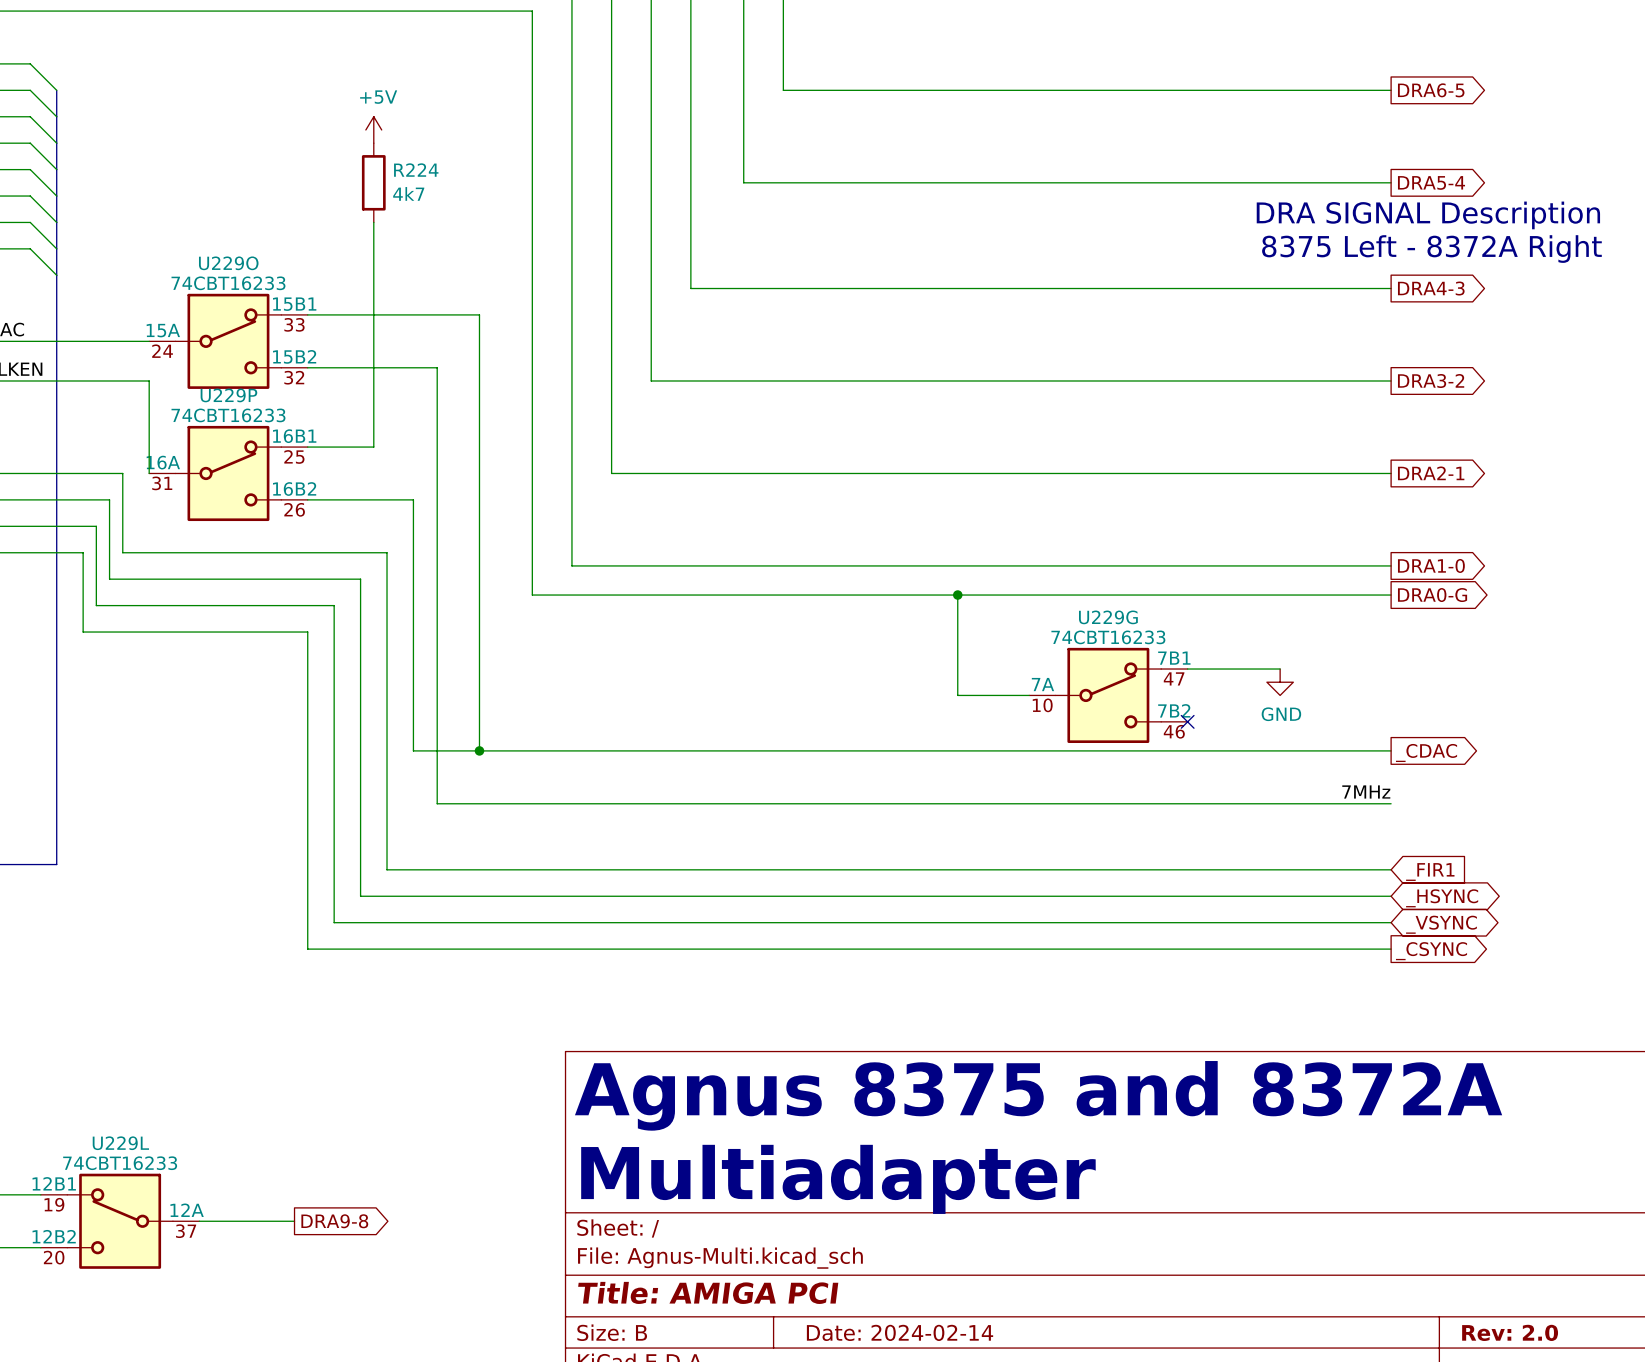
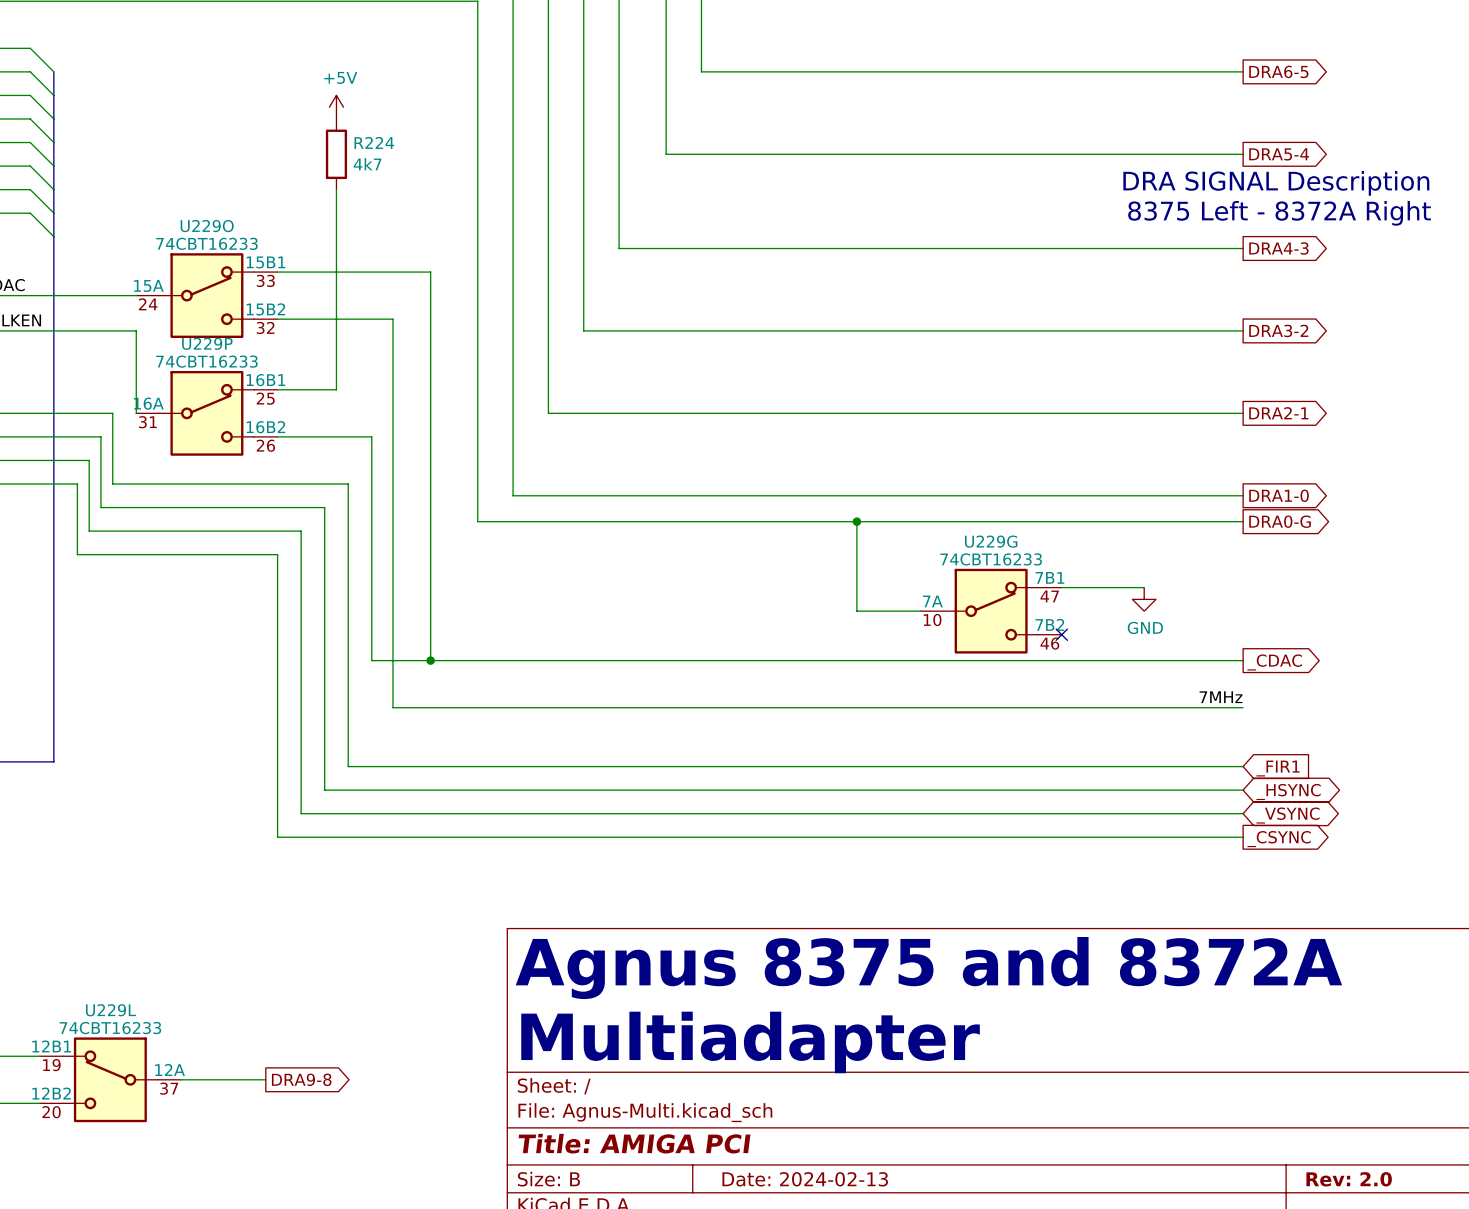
title block: Date: 2024-02-14 (900, 1332) -> Date: 2024-02-13 (805, 1179)

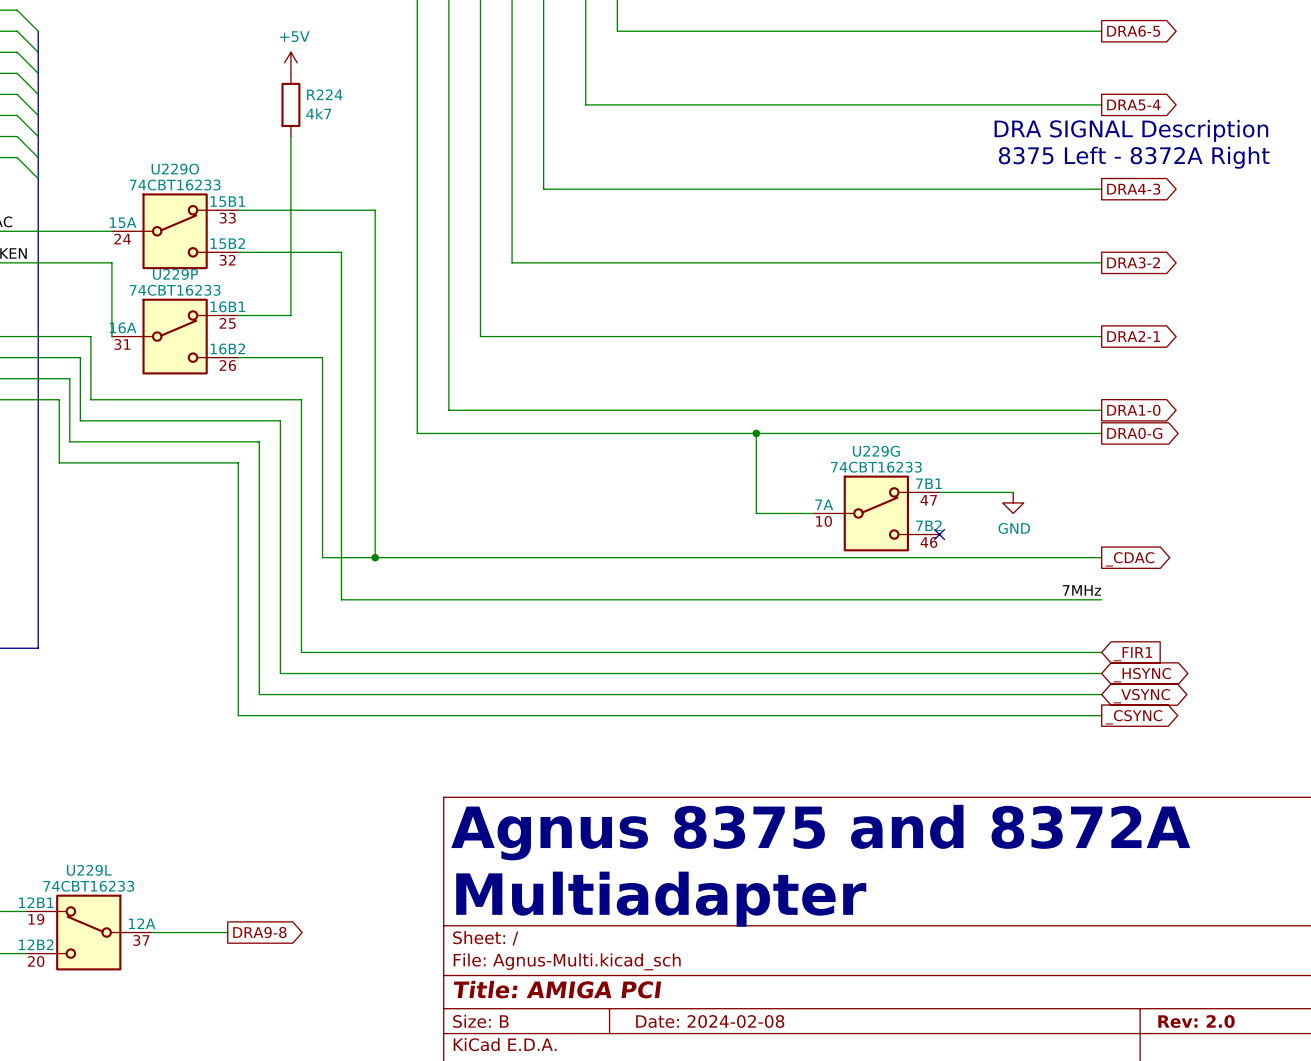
title block: Date: 2024-02-13 (805, 1179) -> Date: 2024-02-08 (710, 1021)

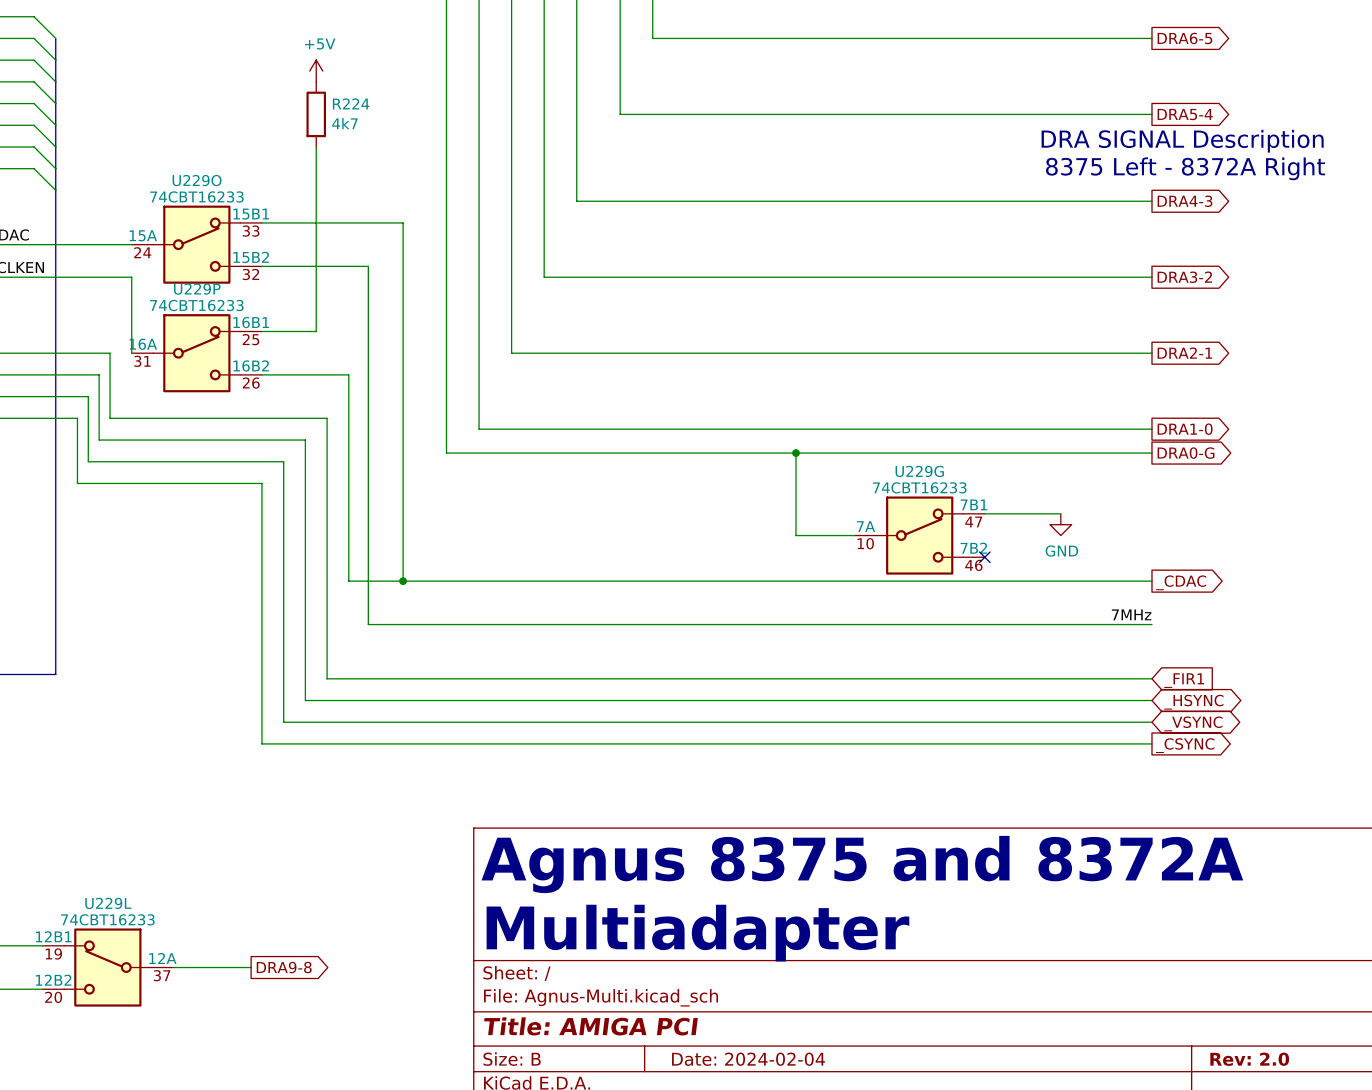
title block: Date: 2024-02-08 (710, 1021) -> Date: 2024-02-04 (748, 1059)

